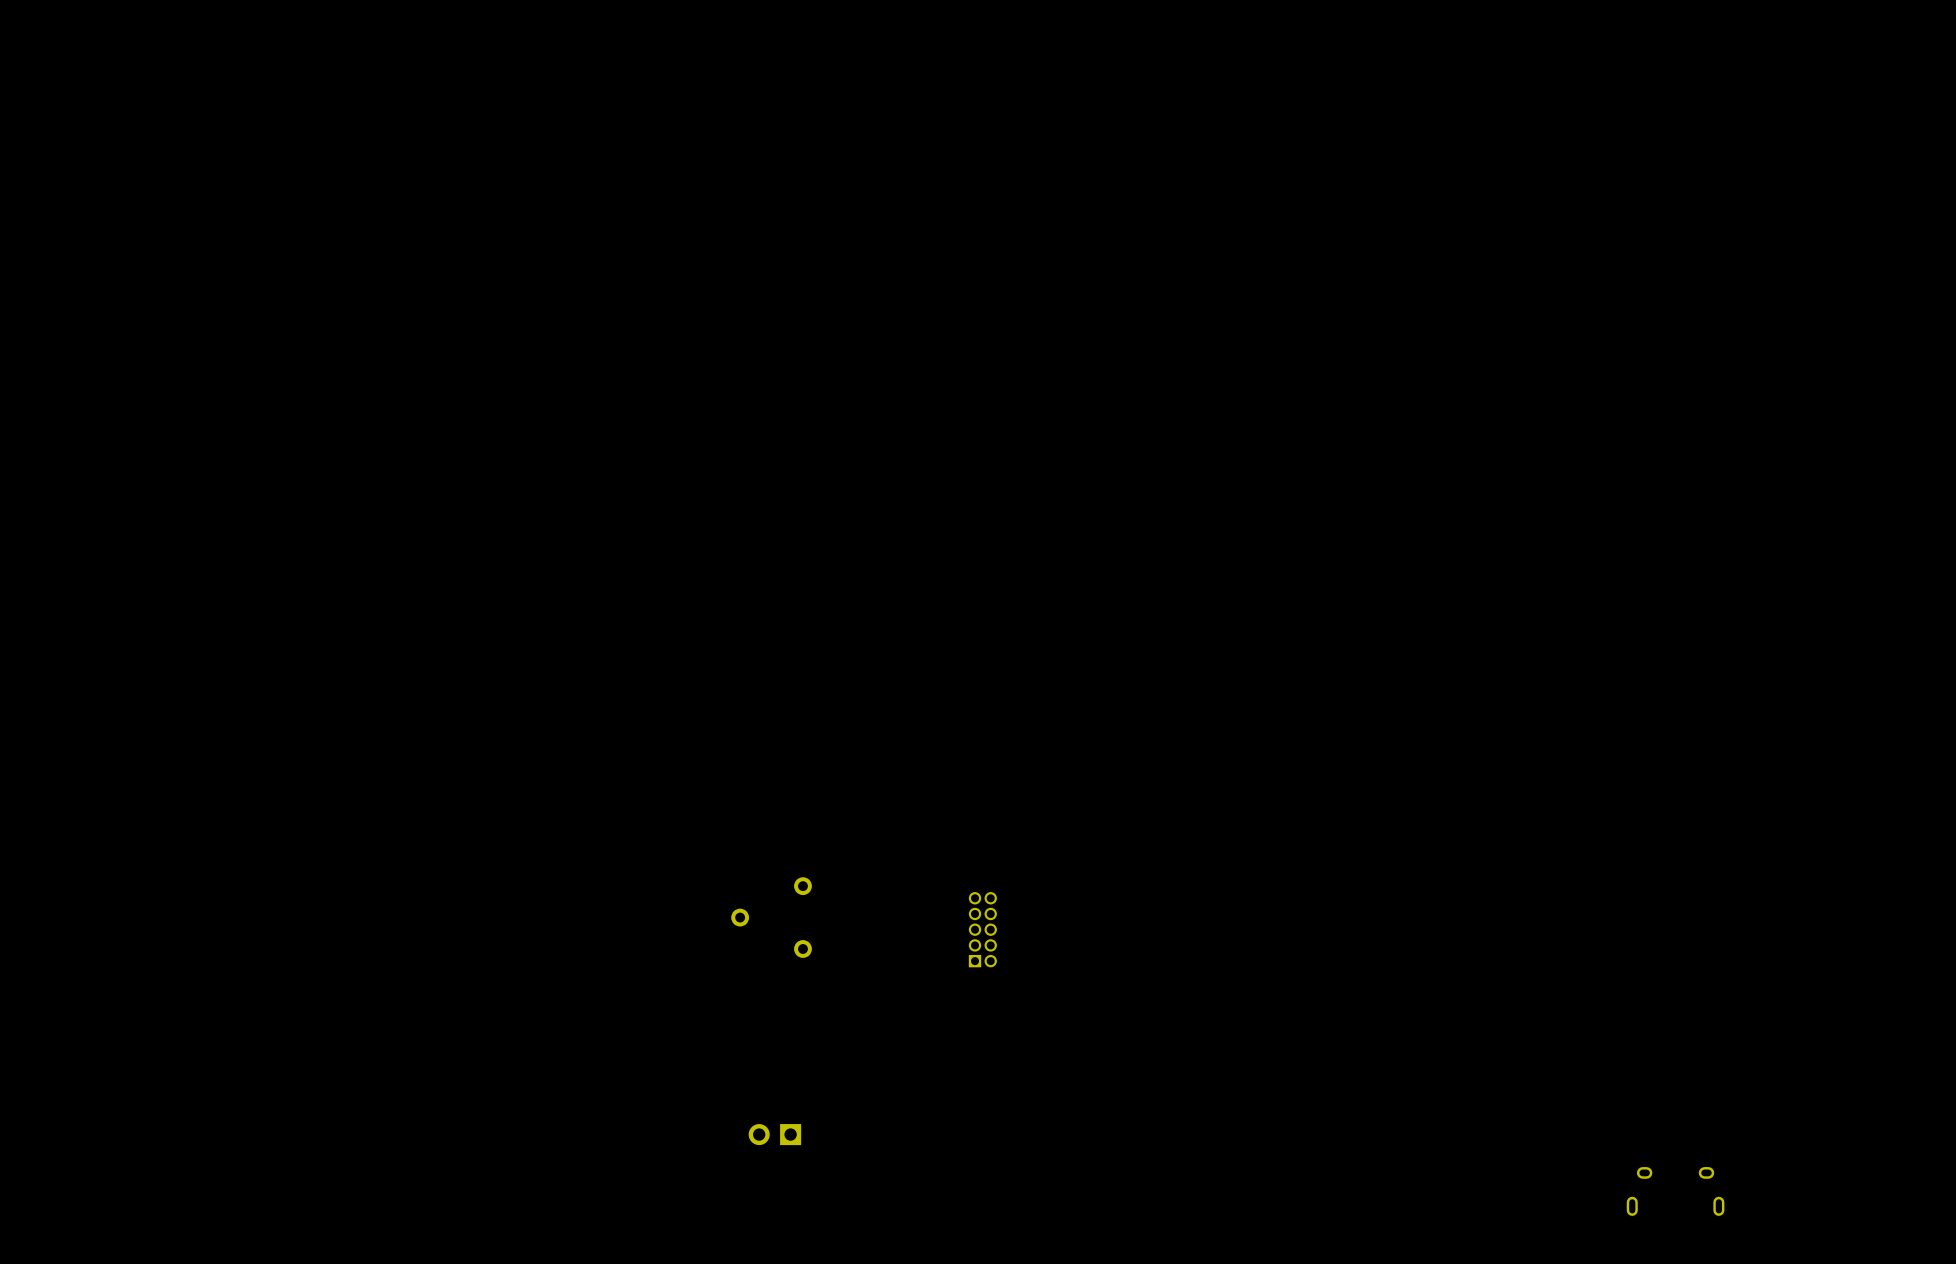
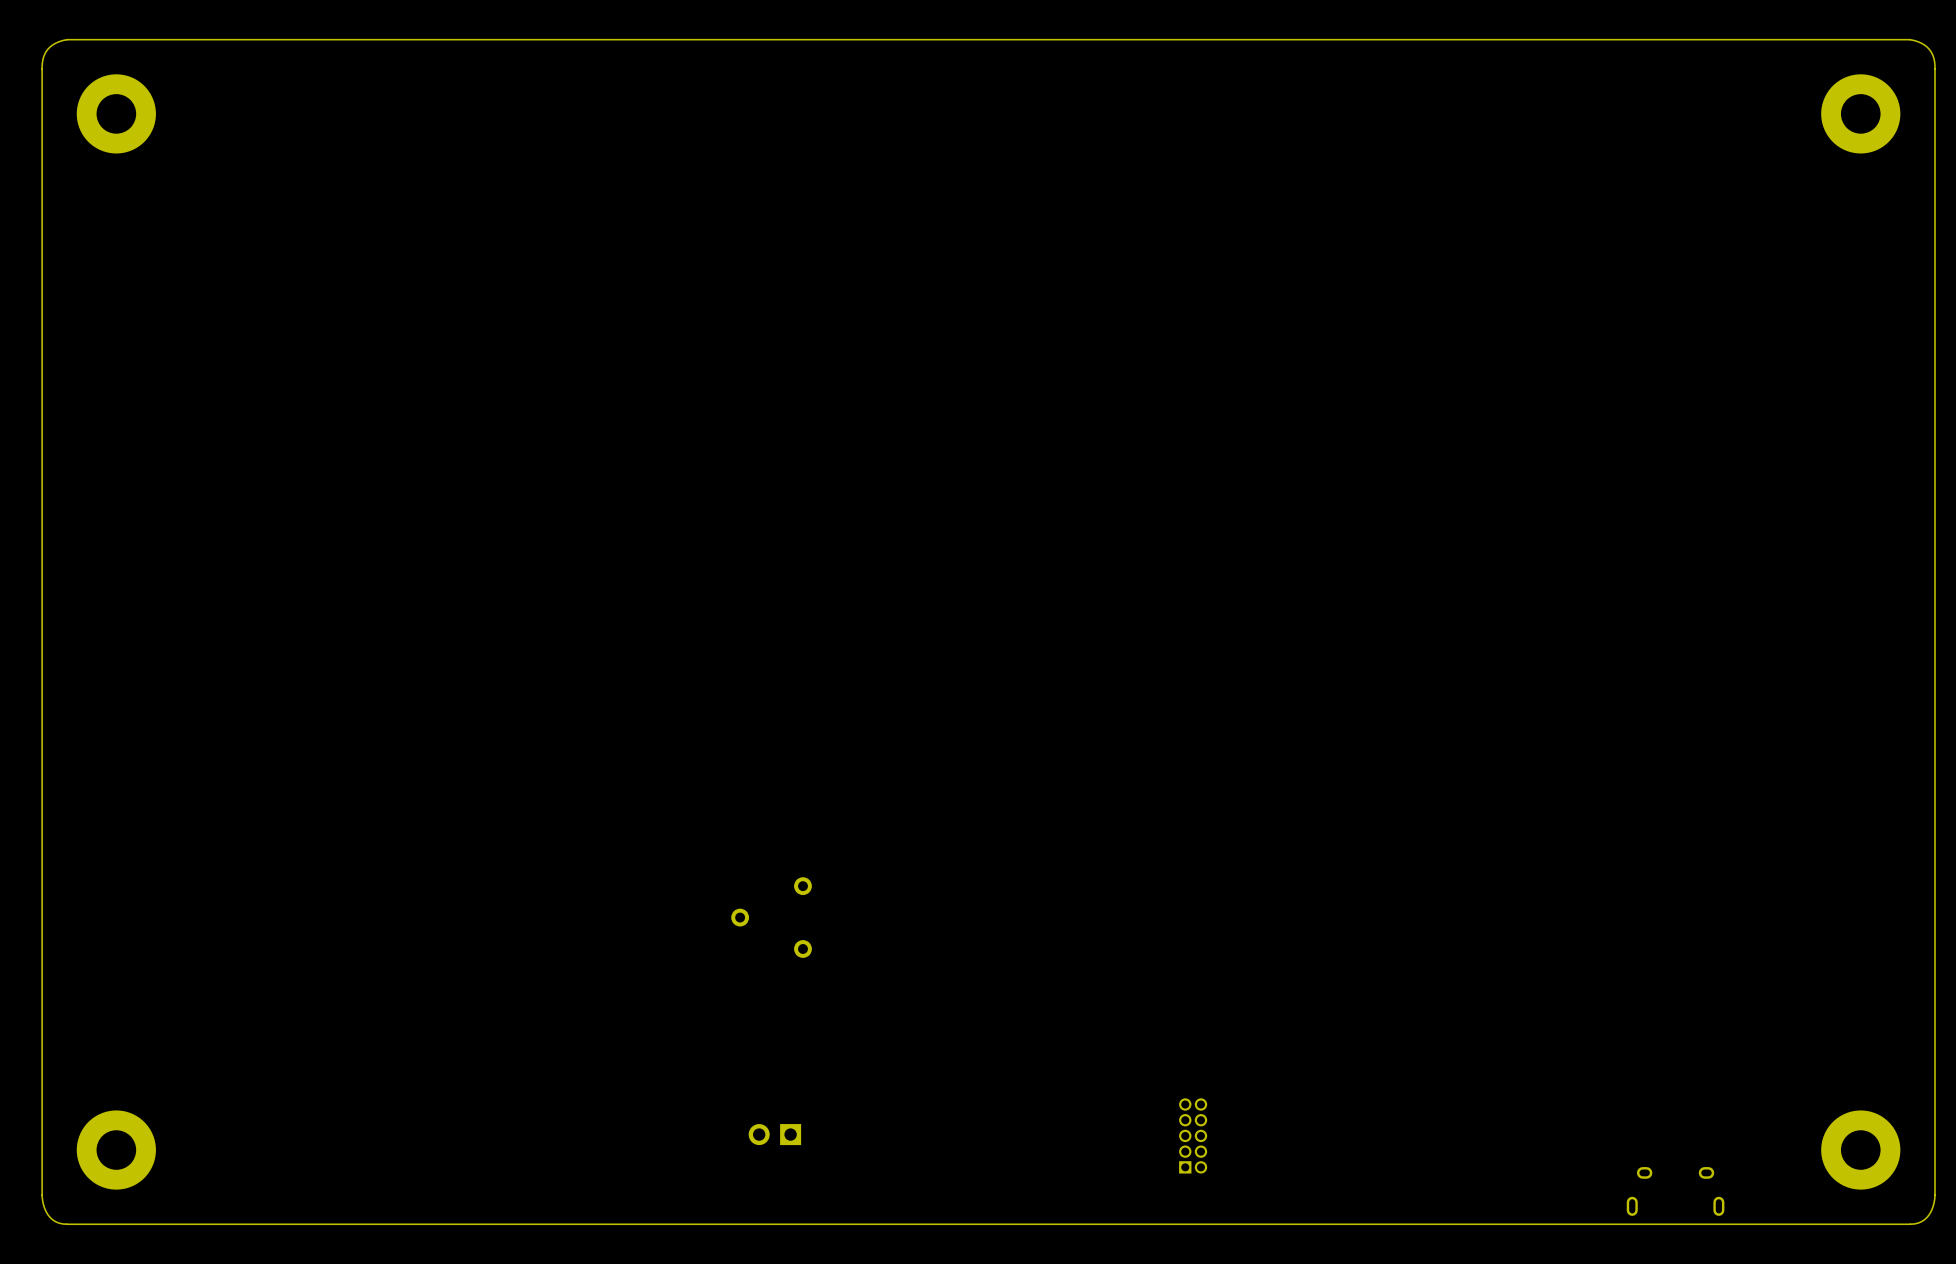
board edge: none -> (1910, 39) (66, 39) (52, 45) (44, 55) (42, 68) (42, 1195) (48, 1215) (55, 1221) (66, 1224) (1910, 1224) (1921, 1221) (1930, 1212) (1935, 1195) (1934, 67) (1933, 57) (1928, 48) (1921, 43) (1910, 39)
part: none -> (116, 113)
part: none -> (1860, 113)
part position: (982, 929) -> (1193, 1135)
part: none -> (116, 1150)
part: none -> (1860, 1150)

